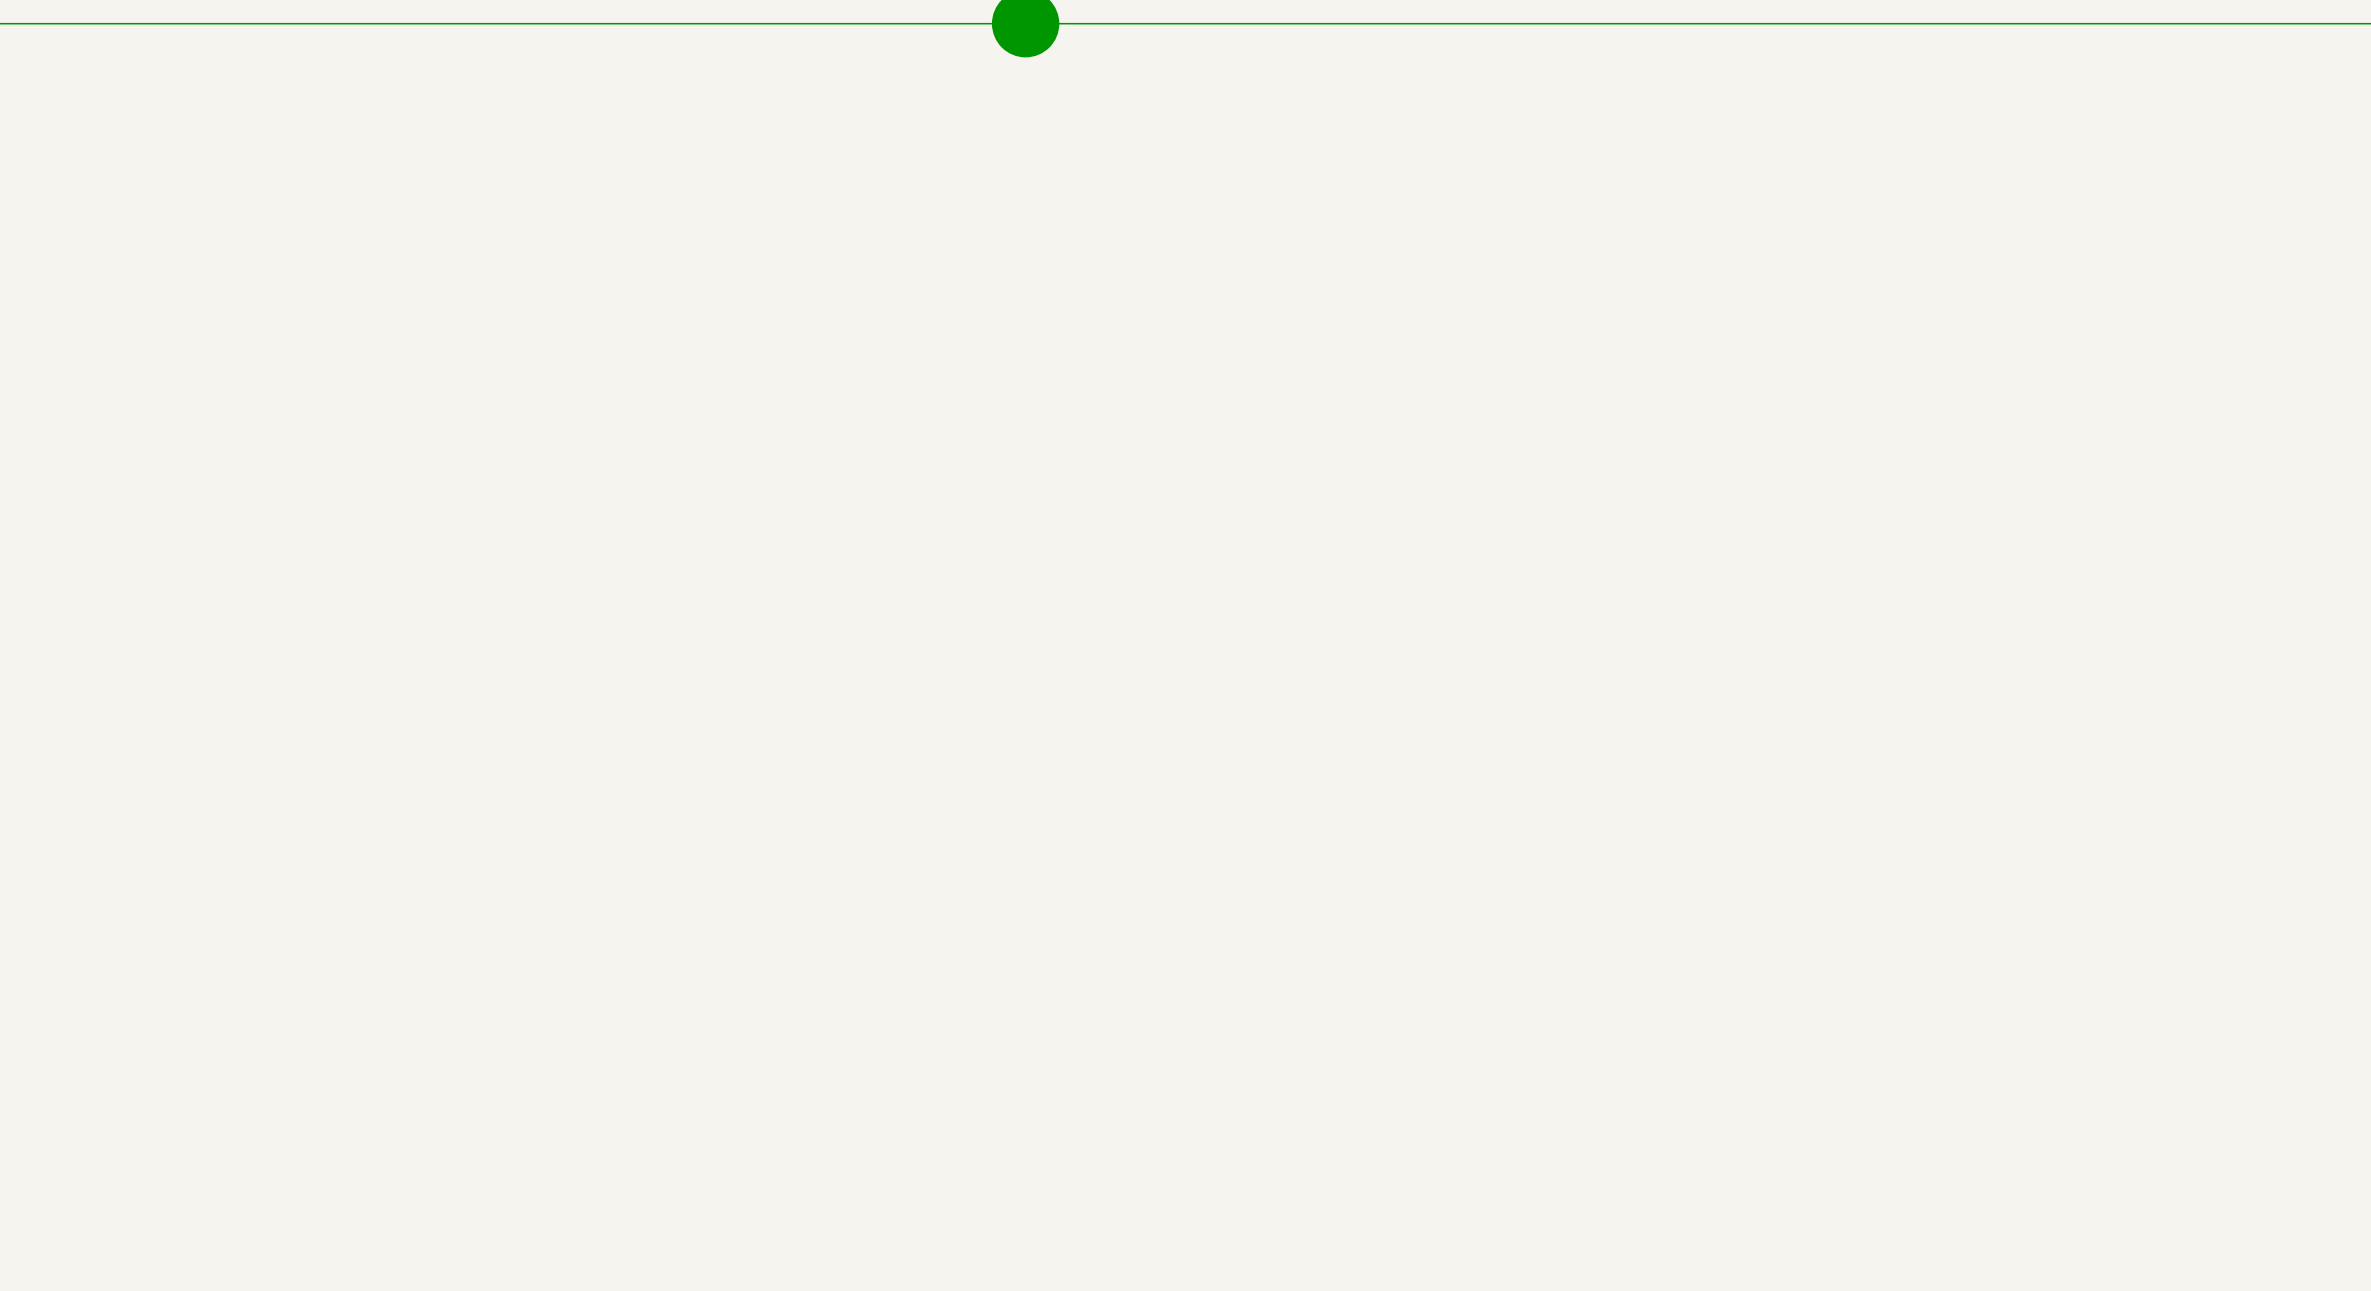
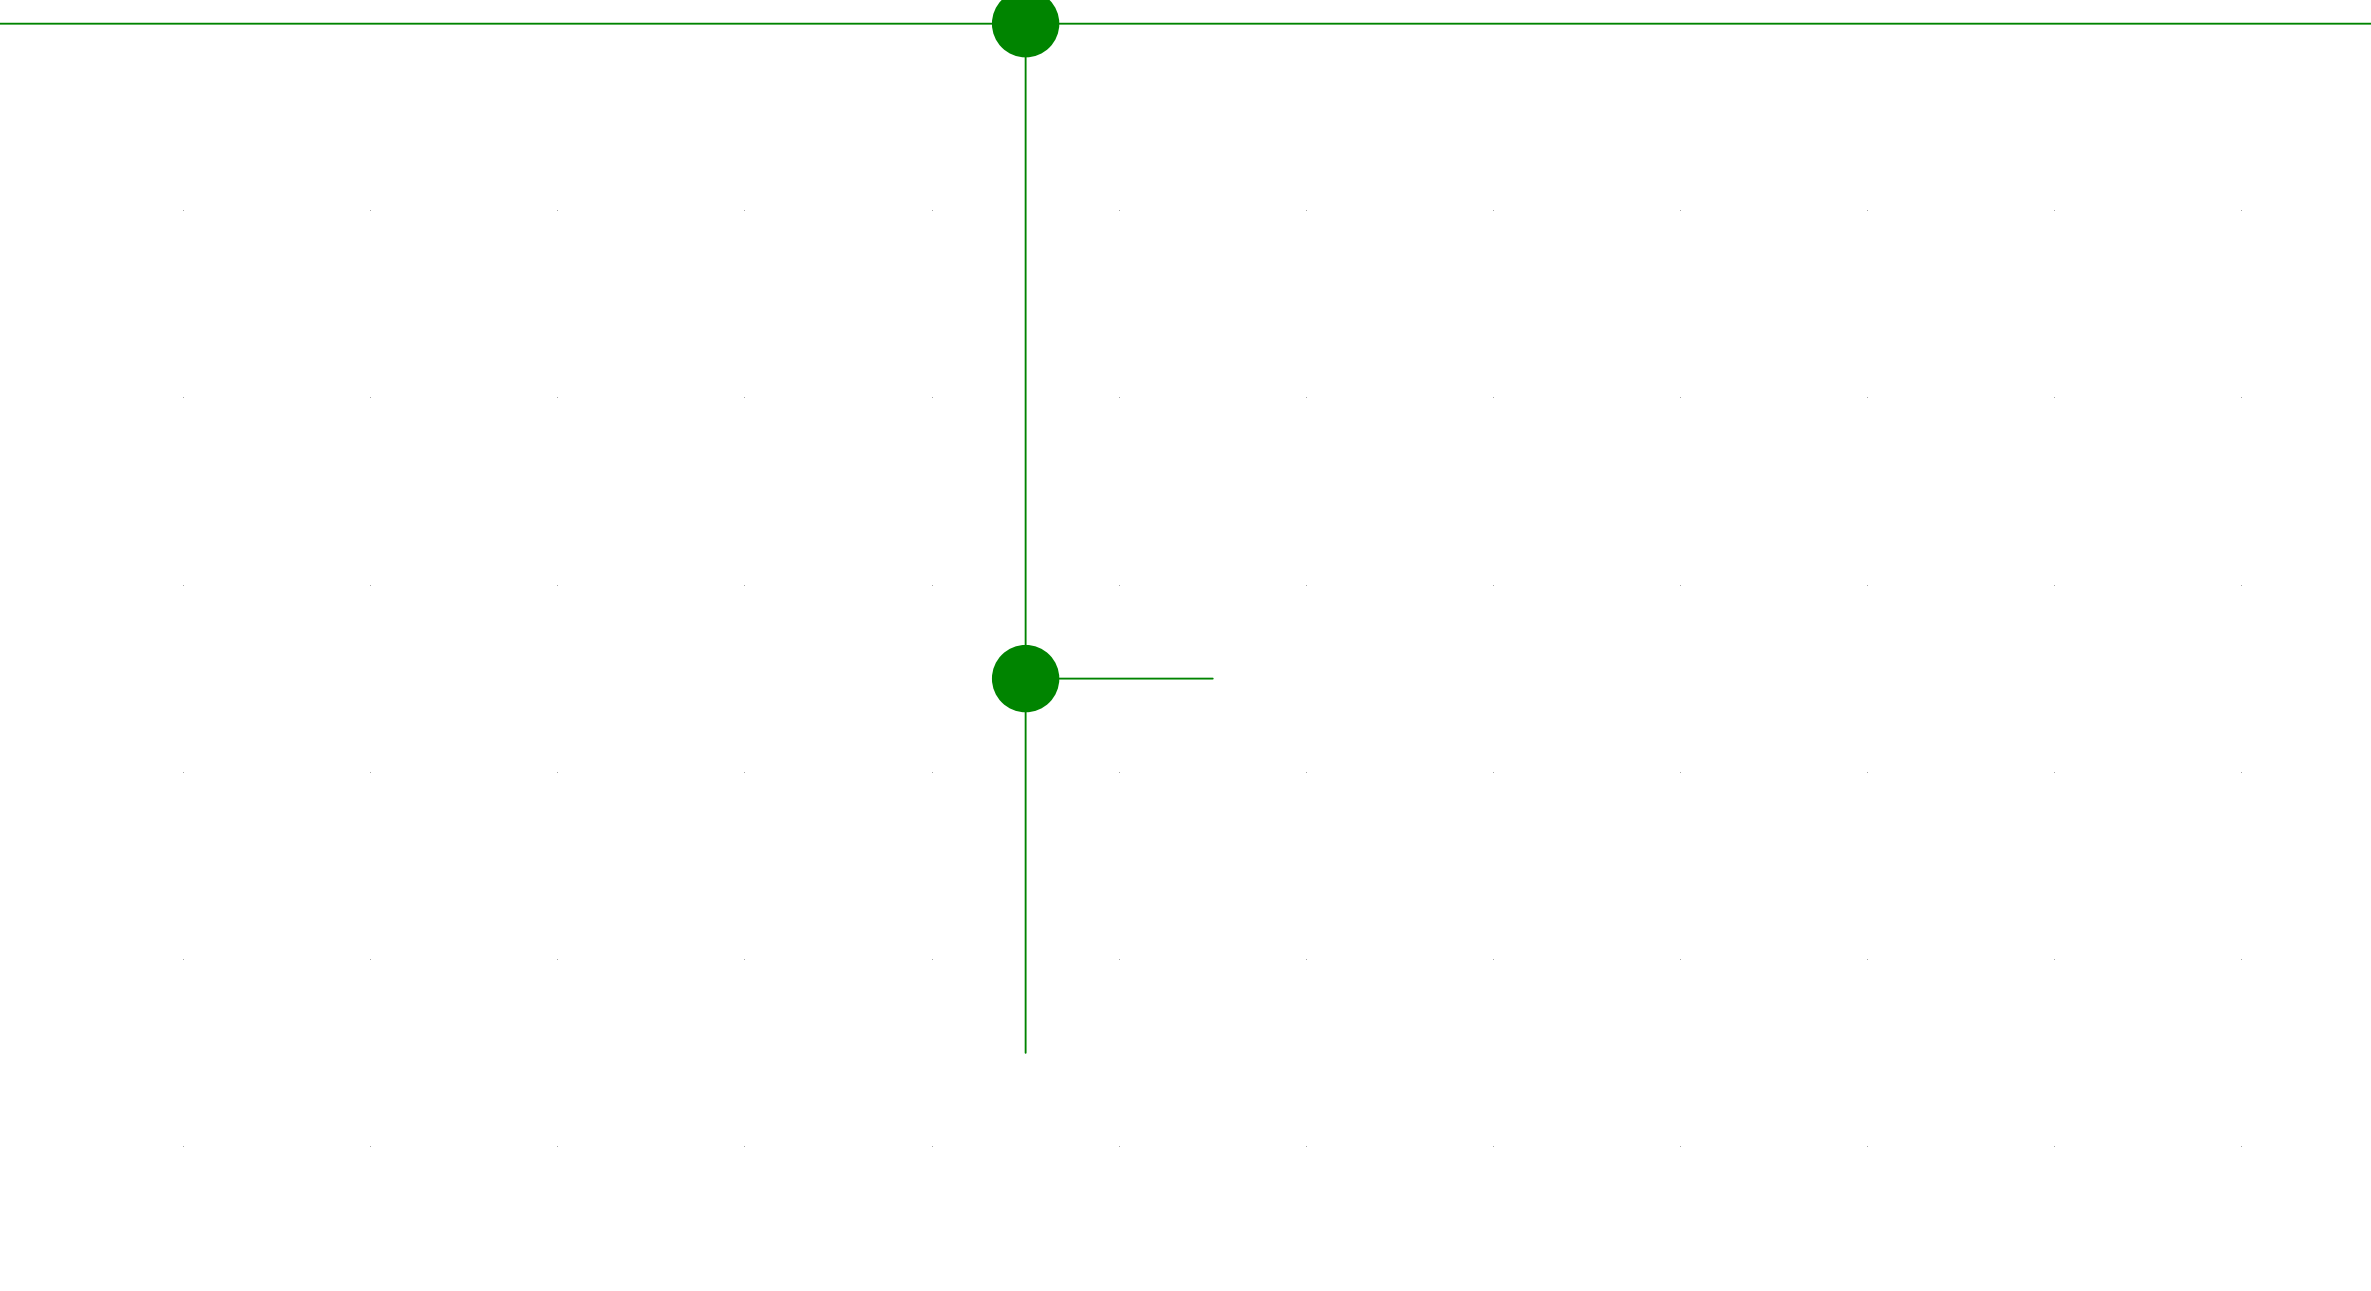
wire: none -> (1025, 23) (1025, 1052)
wire: none -> (1025, 678) (1212, 678)
junction: none -> (1025, 678)

